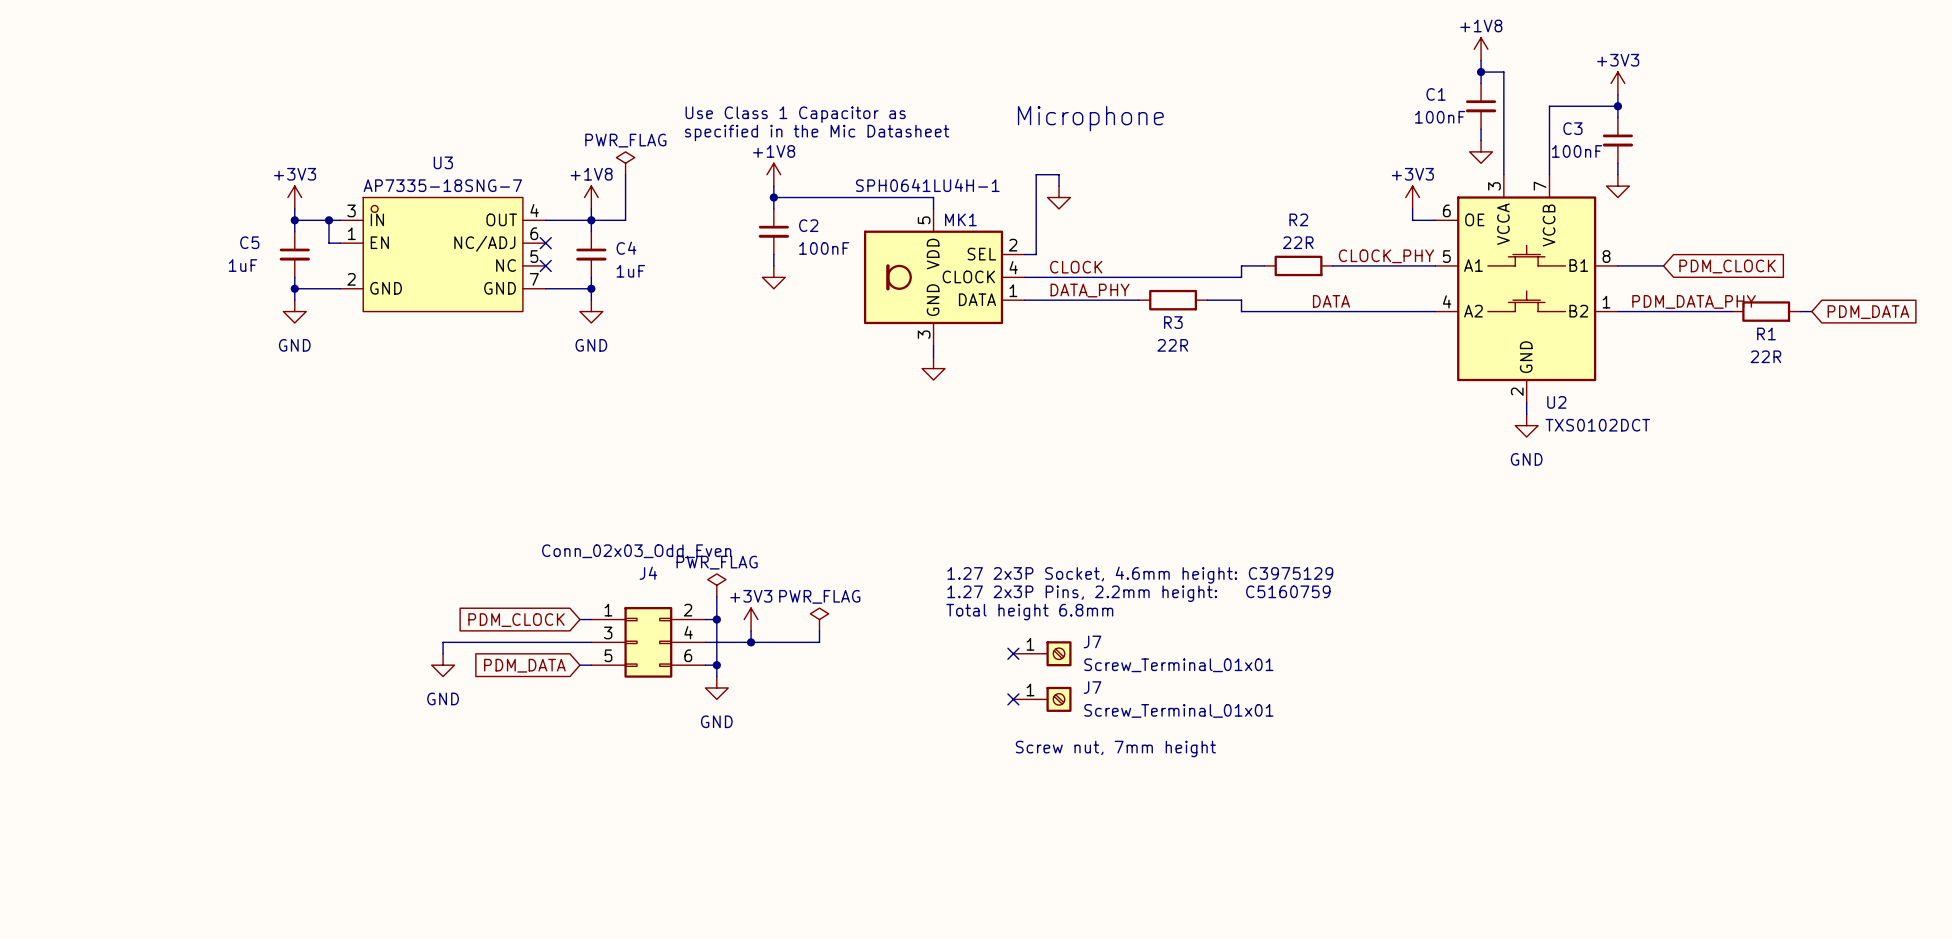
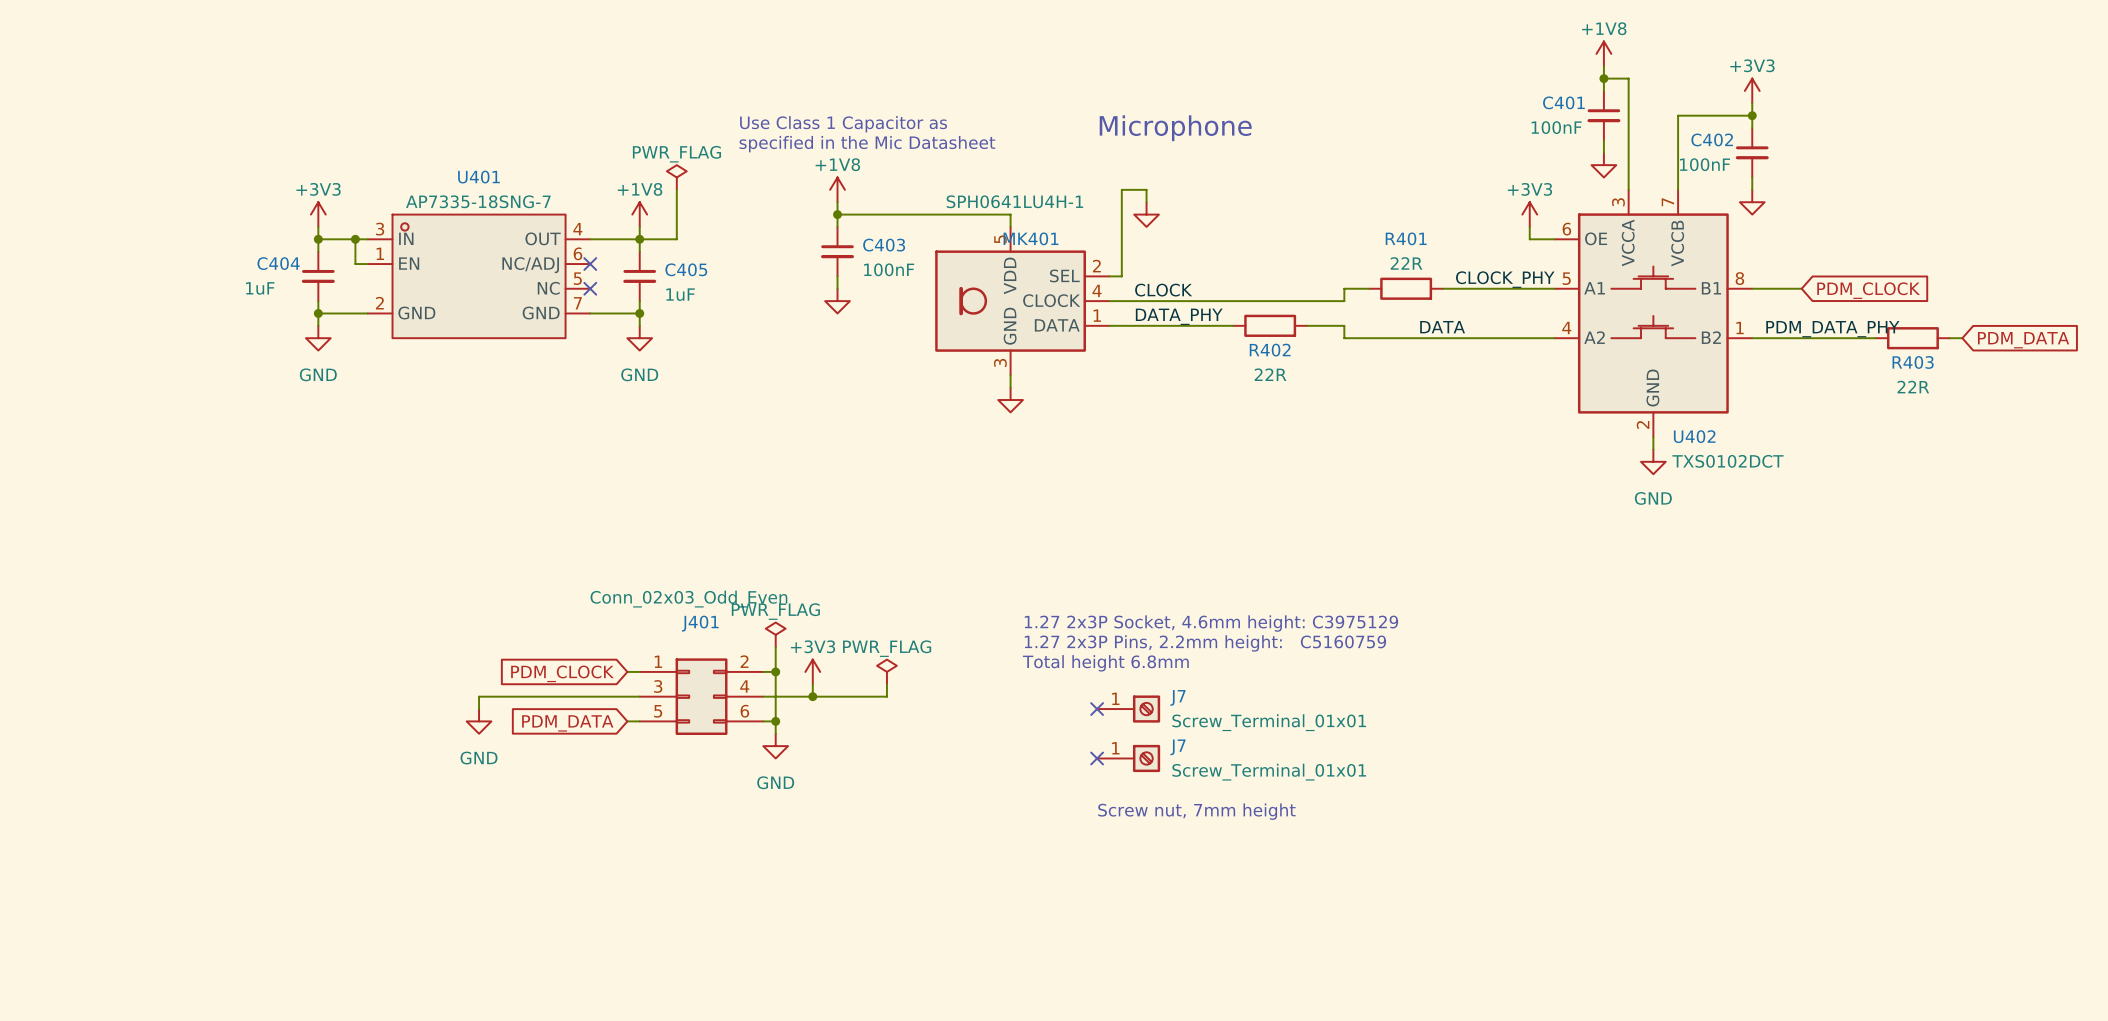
C1 name: C1 (1436, 94) -> C401 (1563, 102)
C3 name: C3 (1572, 128) -> C402 (1712, 139)
U3 name: U3 (443, 162) -> U401 (478, 177)
MK1 name: MK1 (960, 219) -> MK401 (1031, 238)
R2 name: R2 (1298, 219) -> R401 (1406, 238)
C2 name: C2 (808, 225) -> C403 (884, 245)
C5 name: C5 (249, 242) -> C404 (278, 263)
C4 name: C4 (626, 248) -> C405 (686, 269)
R3 name: R3 (1173, 322) -> R402 (1270, 350)
R1 name: R1 (1766, 333) -> R403 (1913, 362)
U2 name: U2 (1556, 402) -> U402 (1694, 436)
J4 name: J4 (648, 573) -> J401 (700, 623)

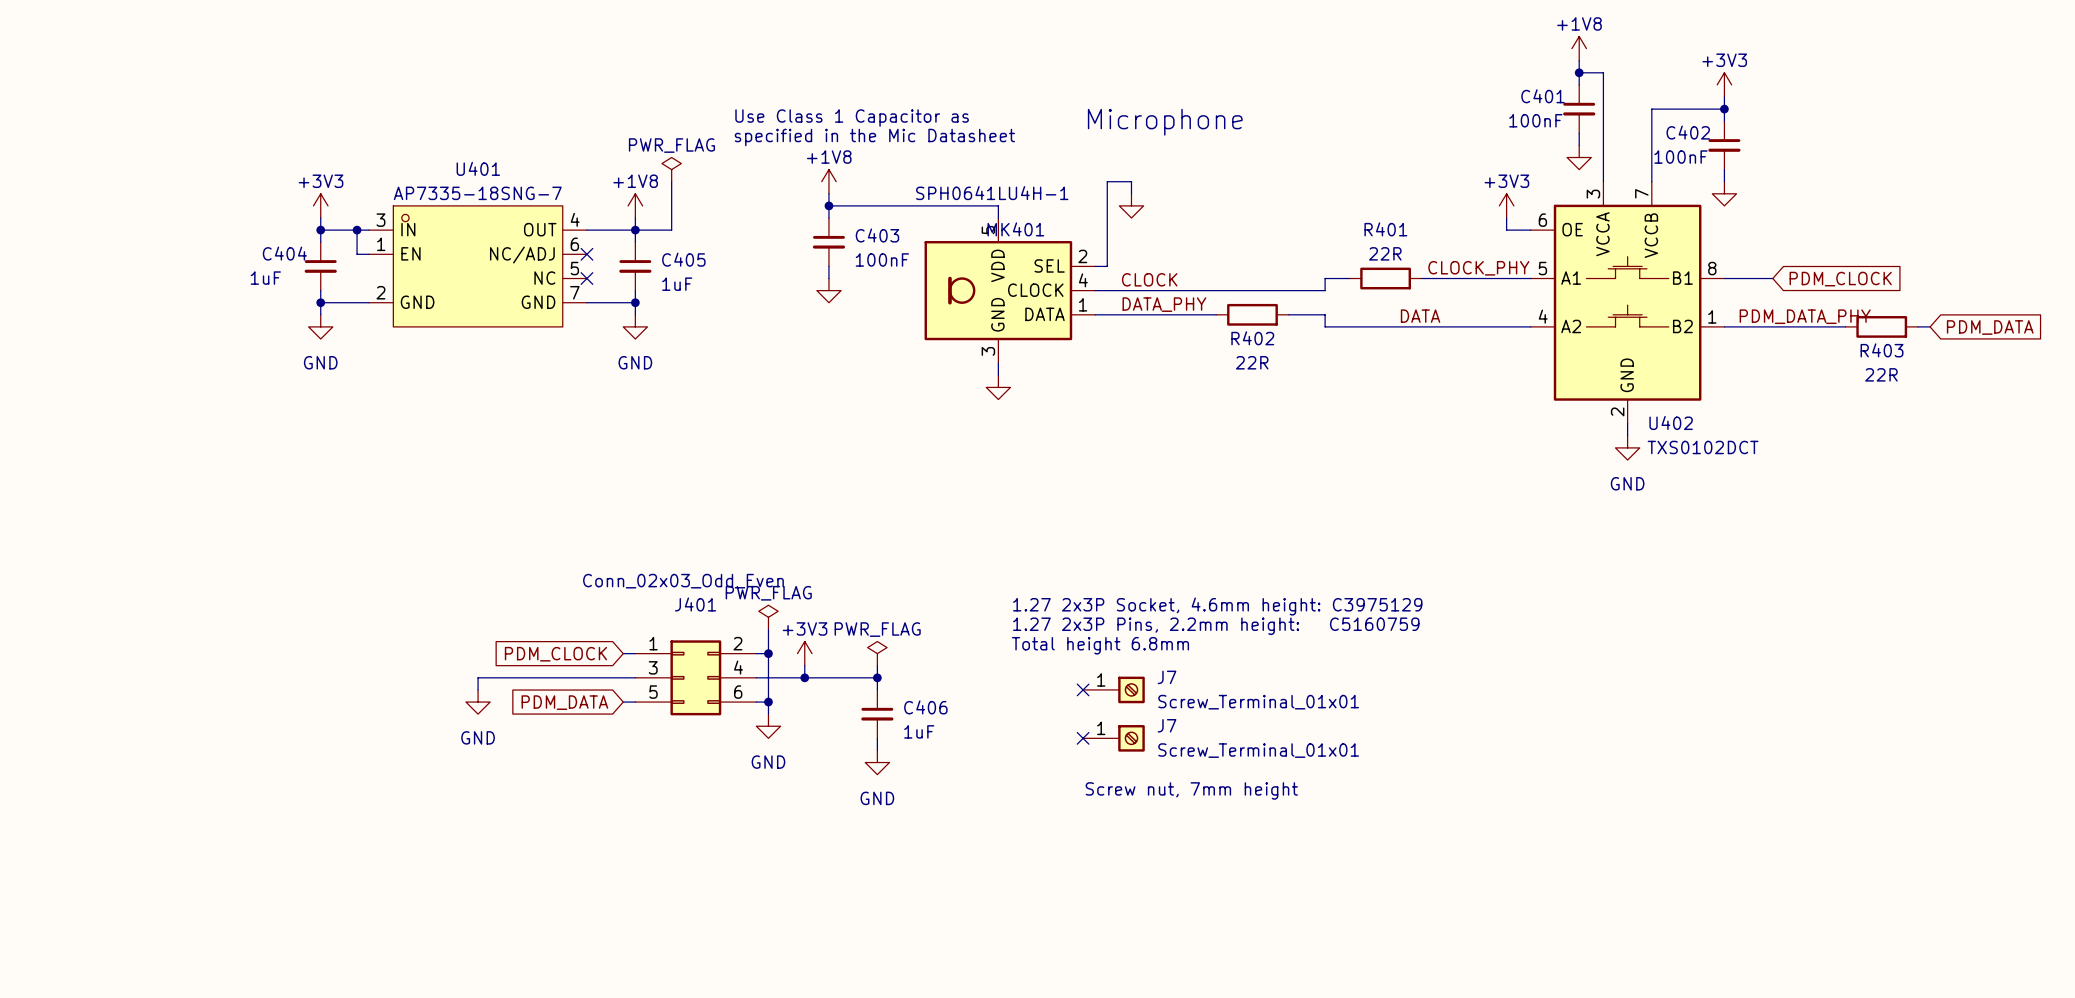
wire: none -> (877, 677) (877, 689)
junction: none -> (877, 677)
C406: none -> 1uF (877, 714)
wire: none -> (877, 738) (877, 750)
power symbol: none -> GND (877, 762)

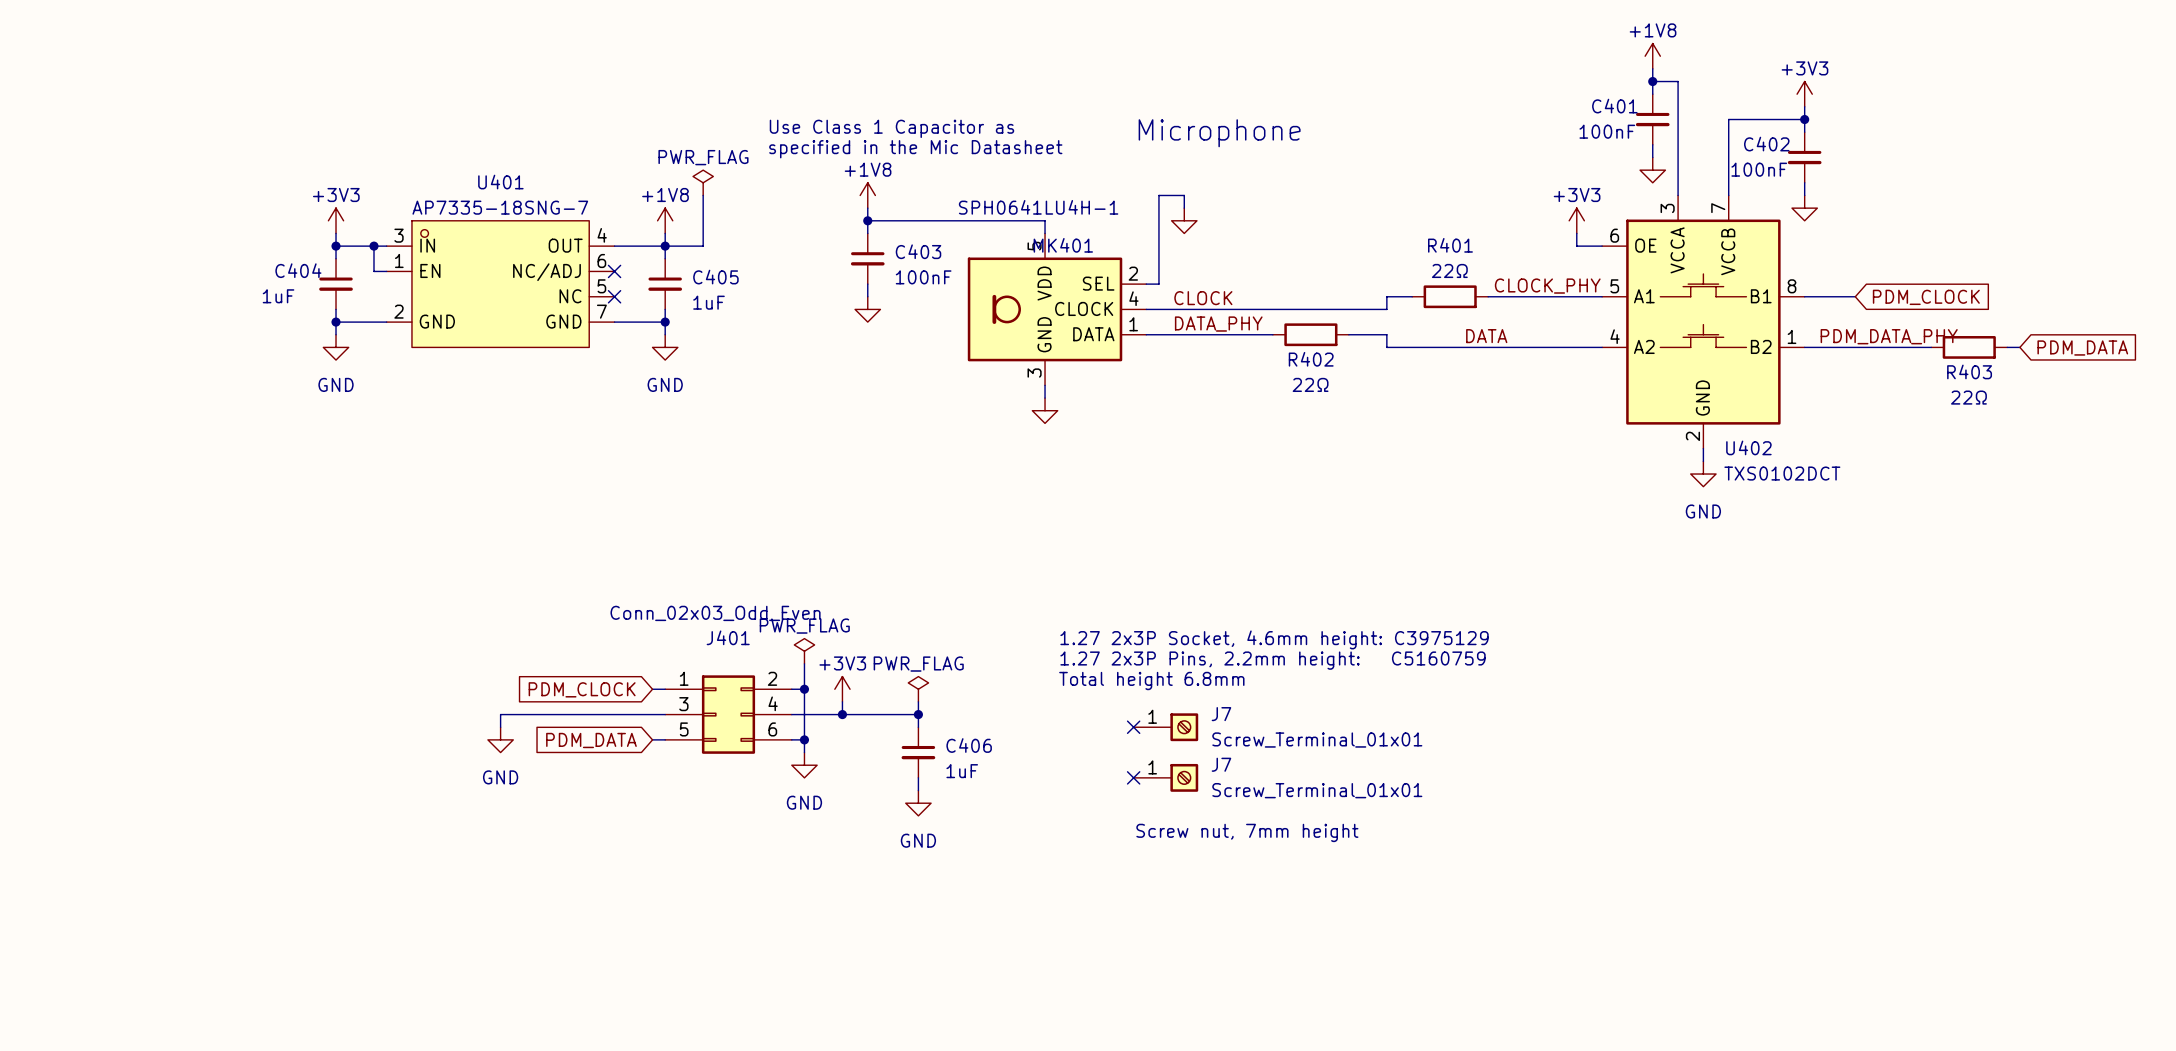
R401 value: 22R (1385, 253) -> 22Ω (1449, 270)
R402 value: 22R (1252, 362) -> 22Ω (1310, 384)
R403 value: 22R (1881, 374) -> 22Ω (1968, 397)

